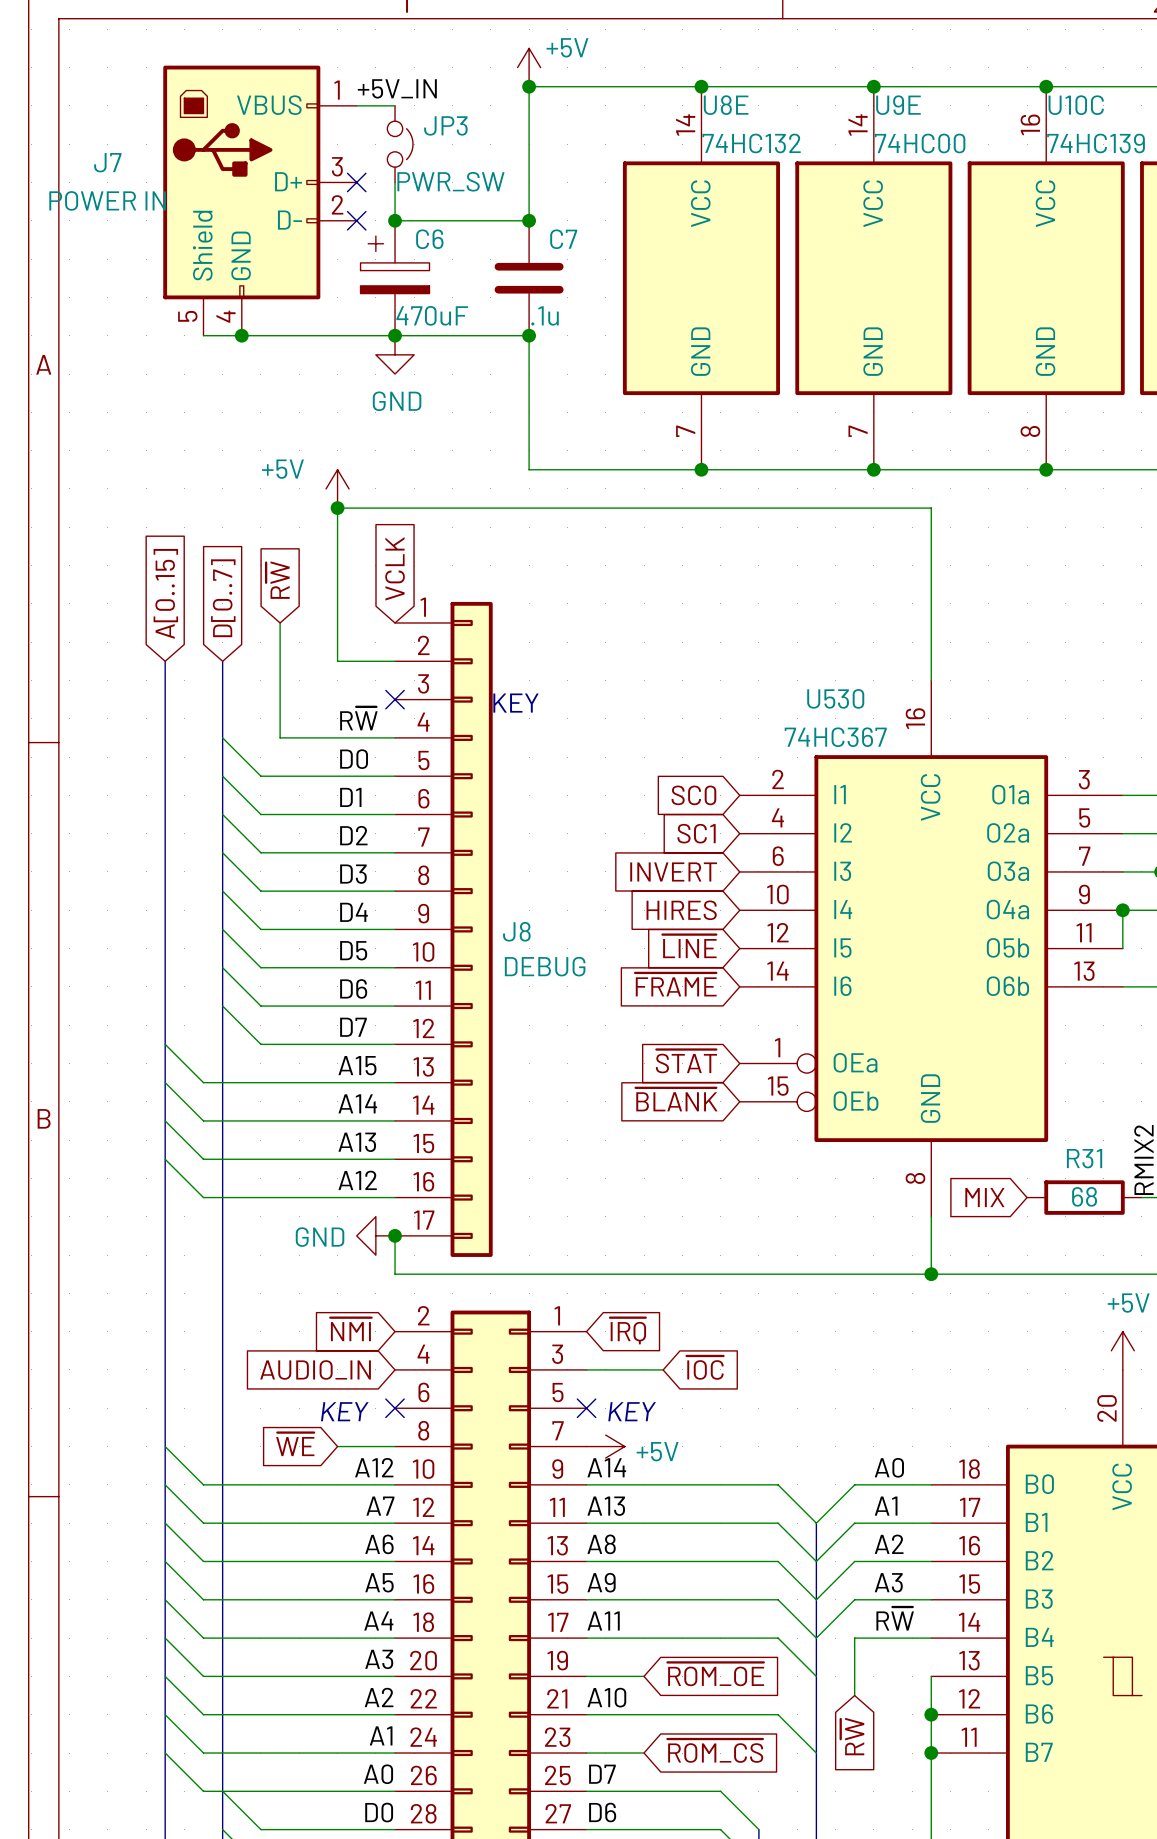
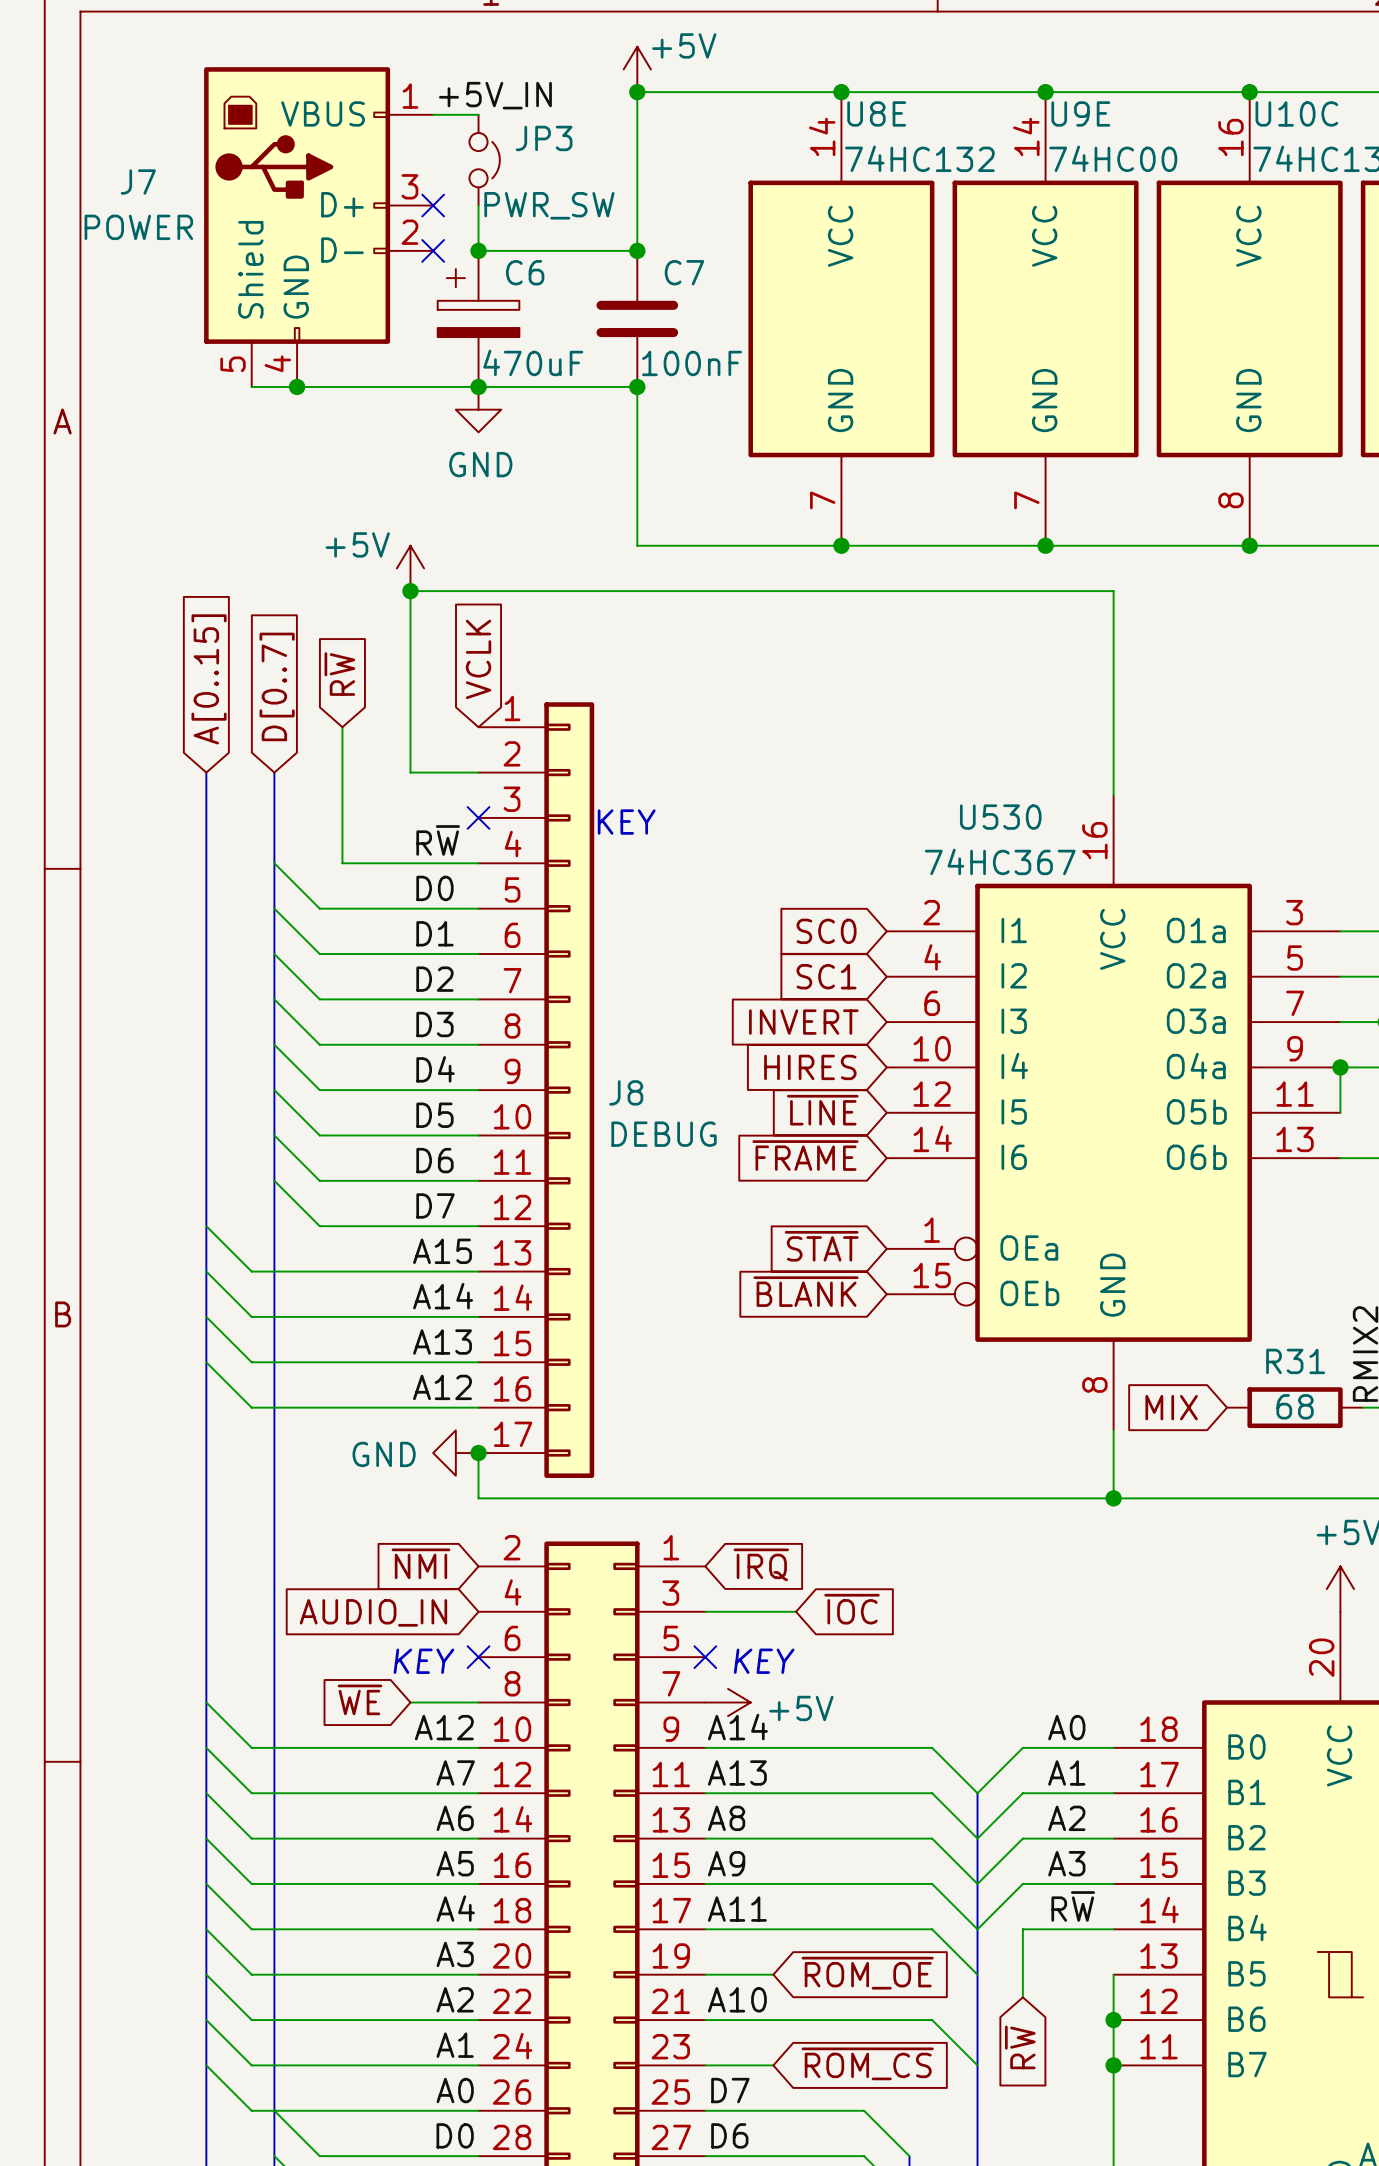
J7 value: POWER IN (107, 200) -> POWER (138, 227)
C7 value: .1u (545, 315) -> 100nF (692, 363)

